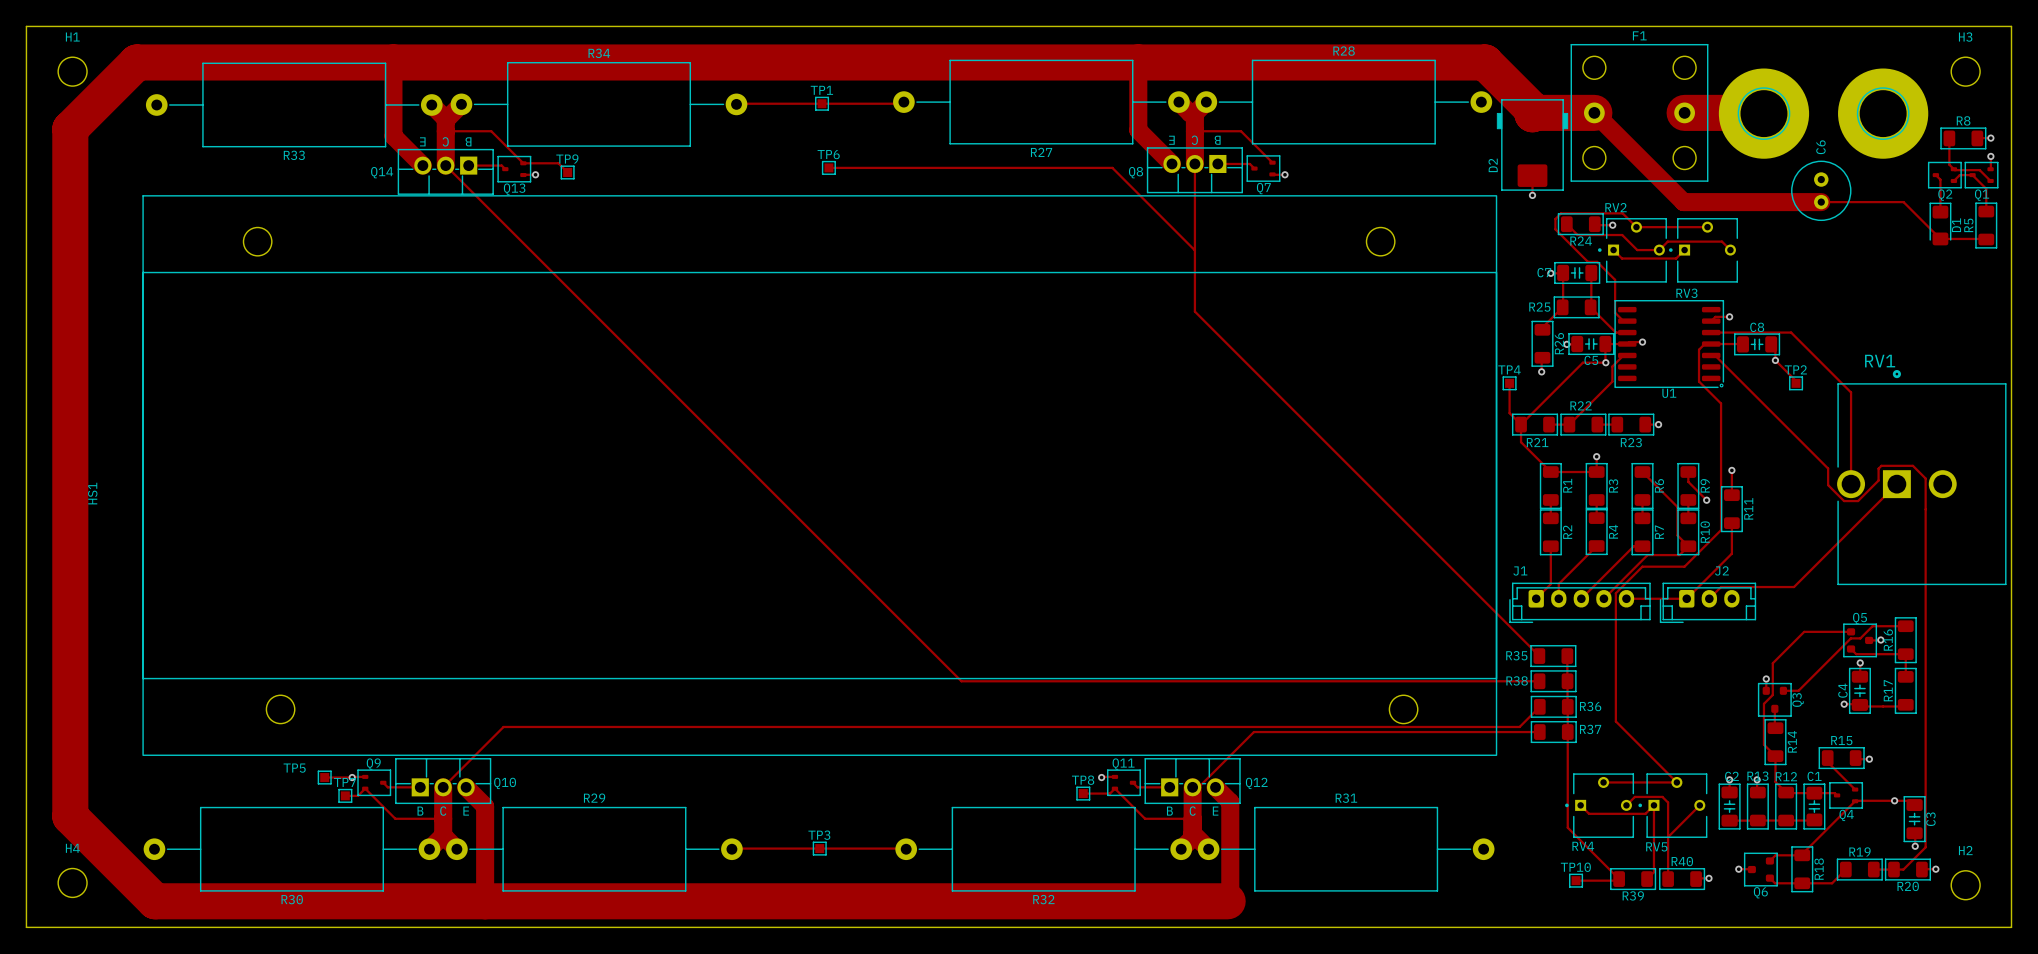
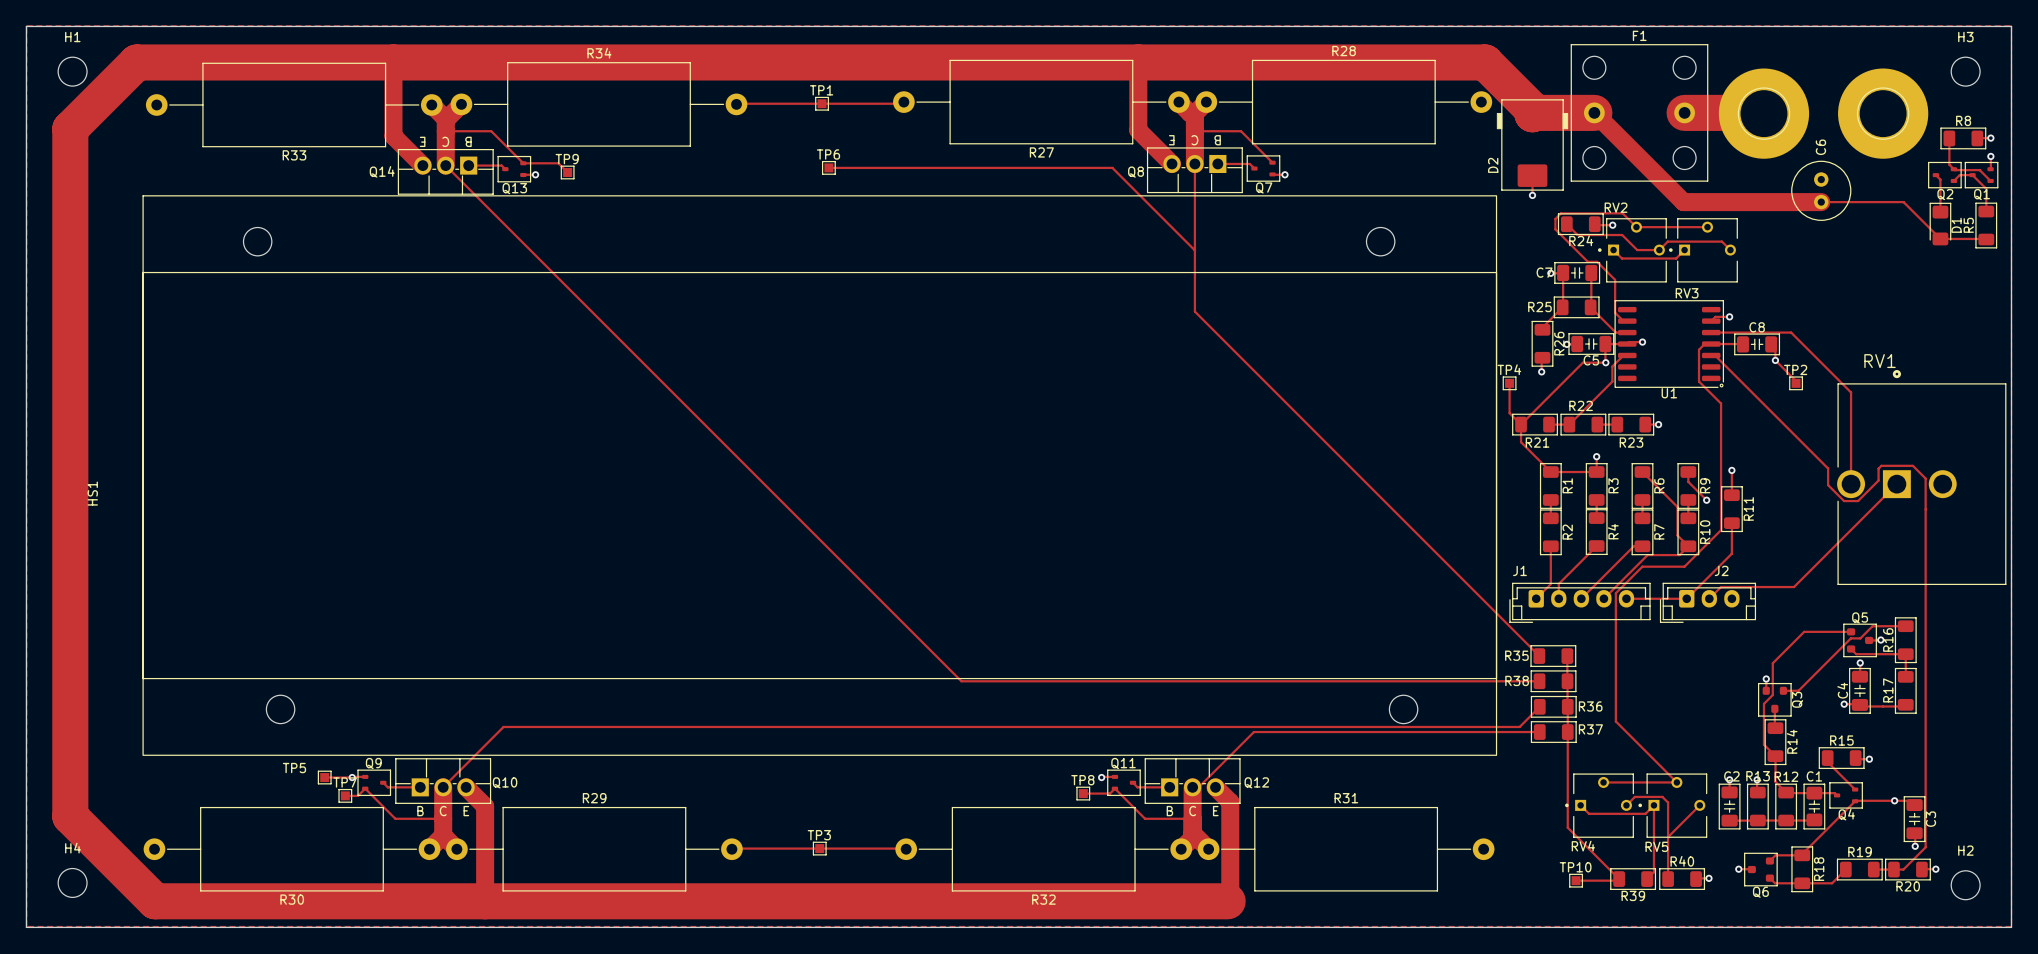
zone outline: none -> (26, 25) (2011, 25) (2011, 926) (26, 926) (26, 25)

